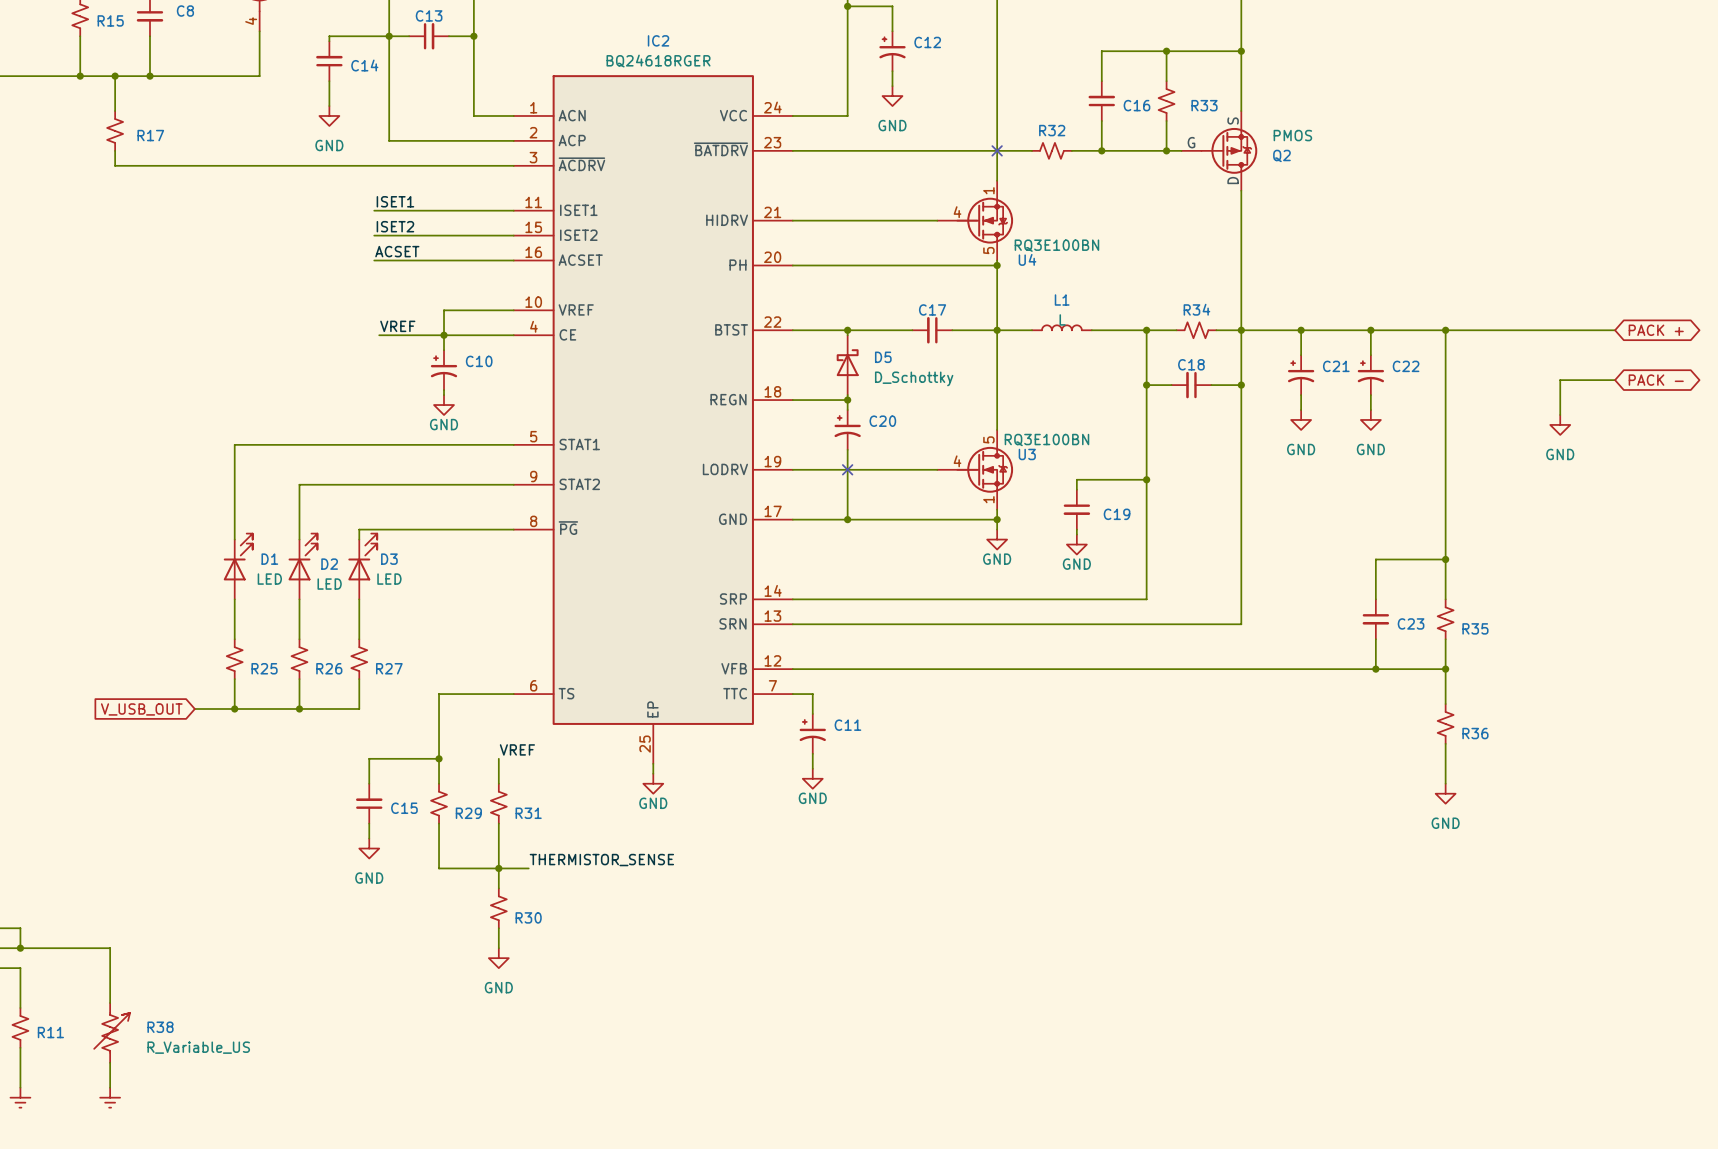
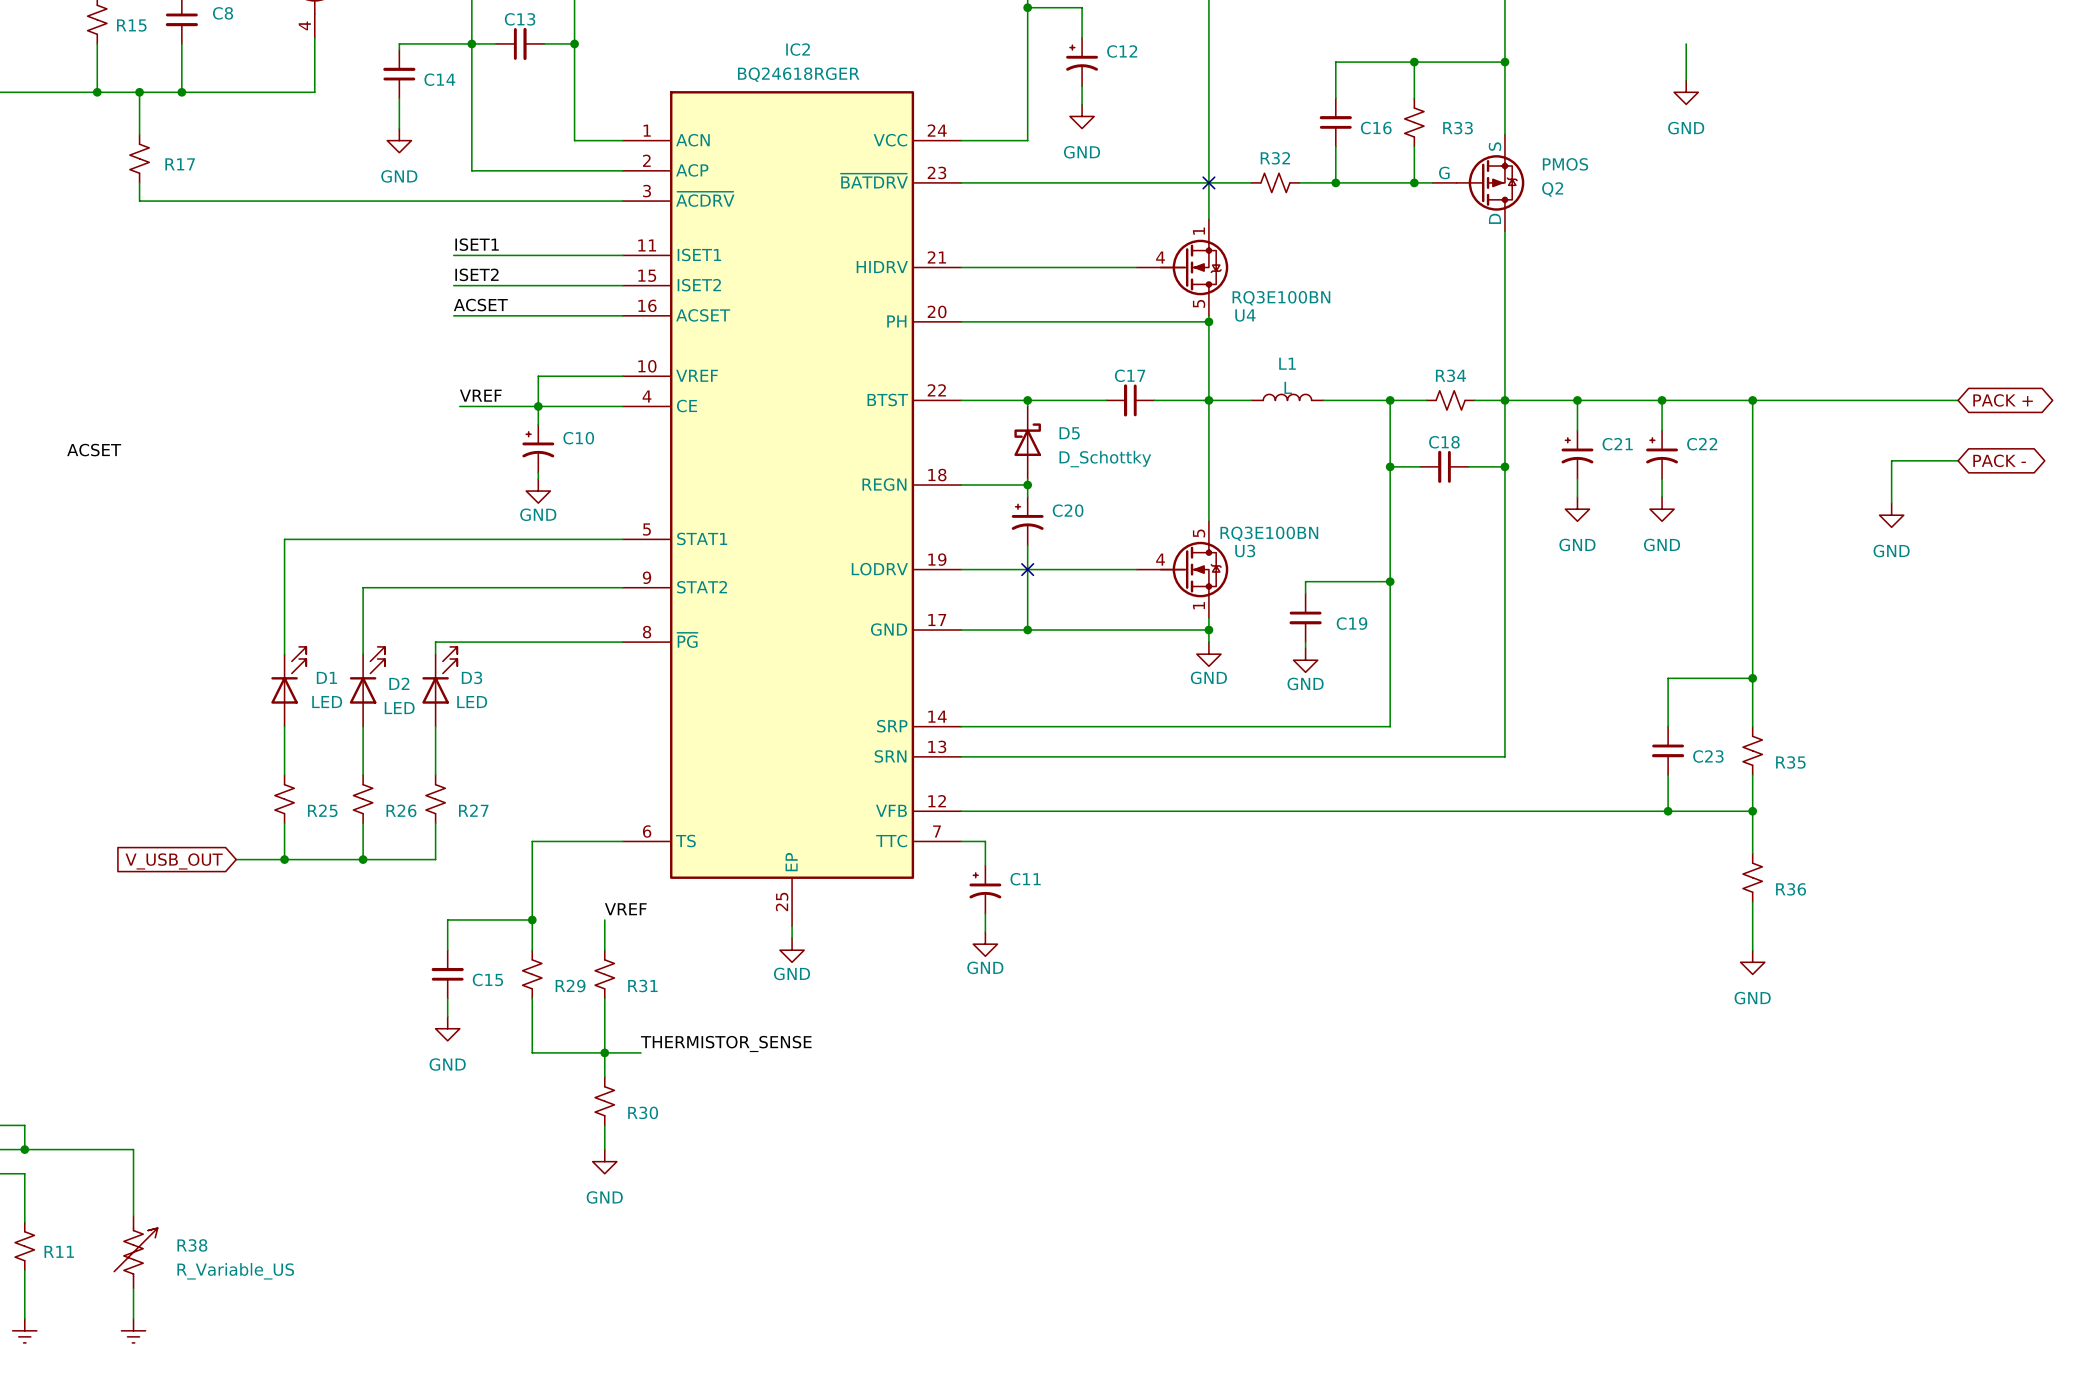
wire: none -> (1686, 43) (1686, 80)
power symbol: none -> GND (1686, 92)
label: none -> ACSET (94, 450)

